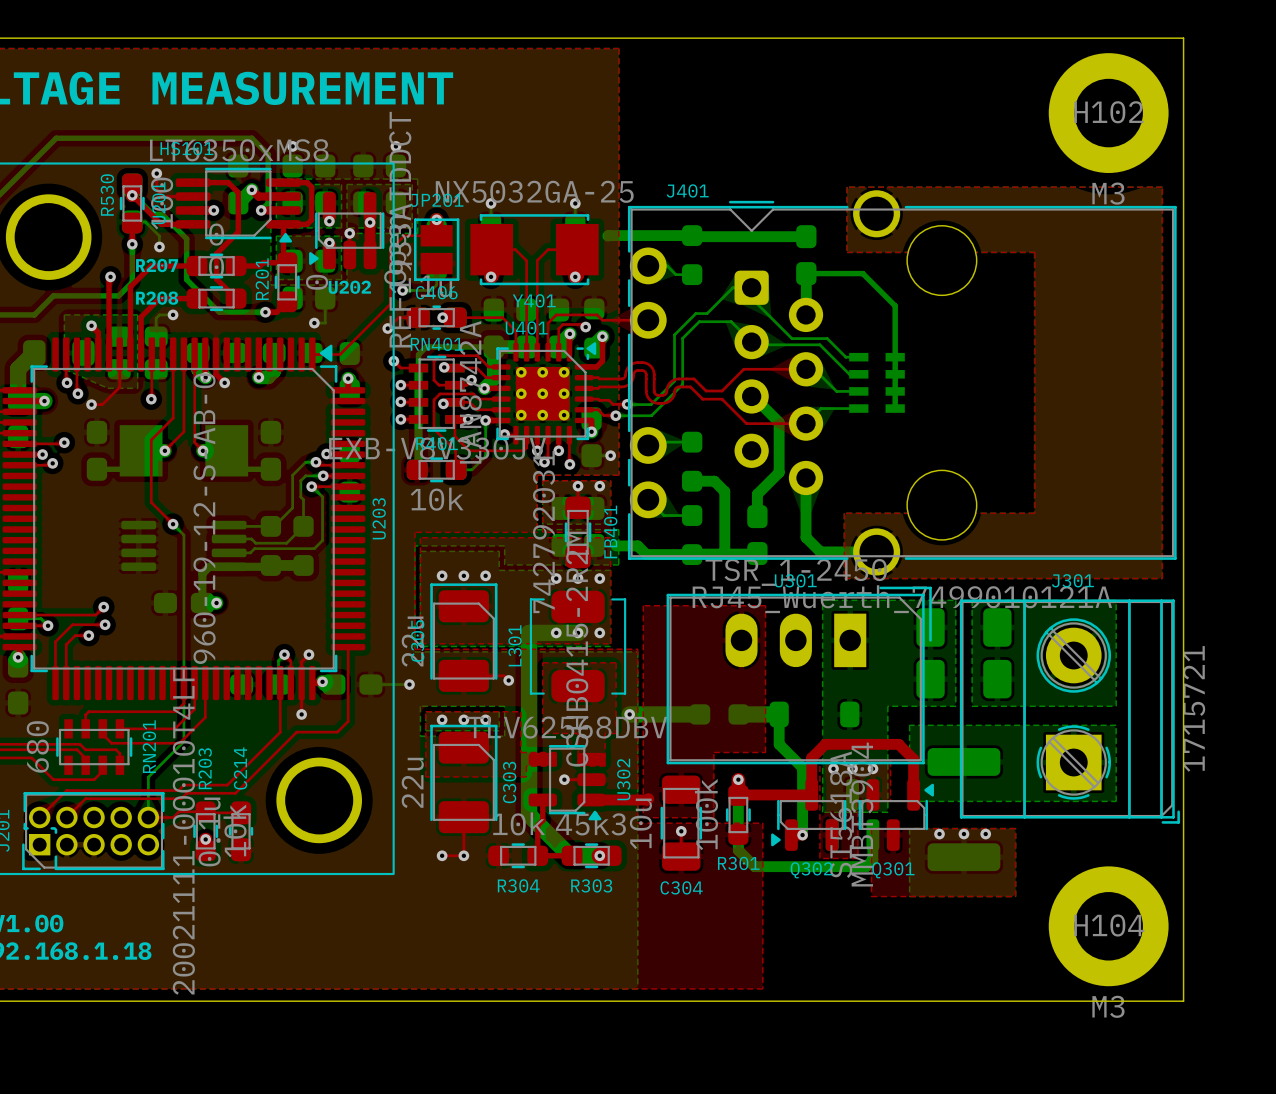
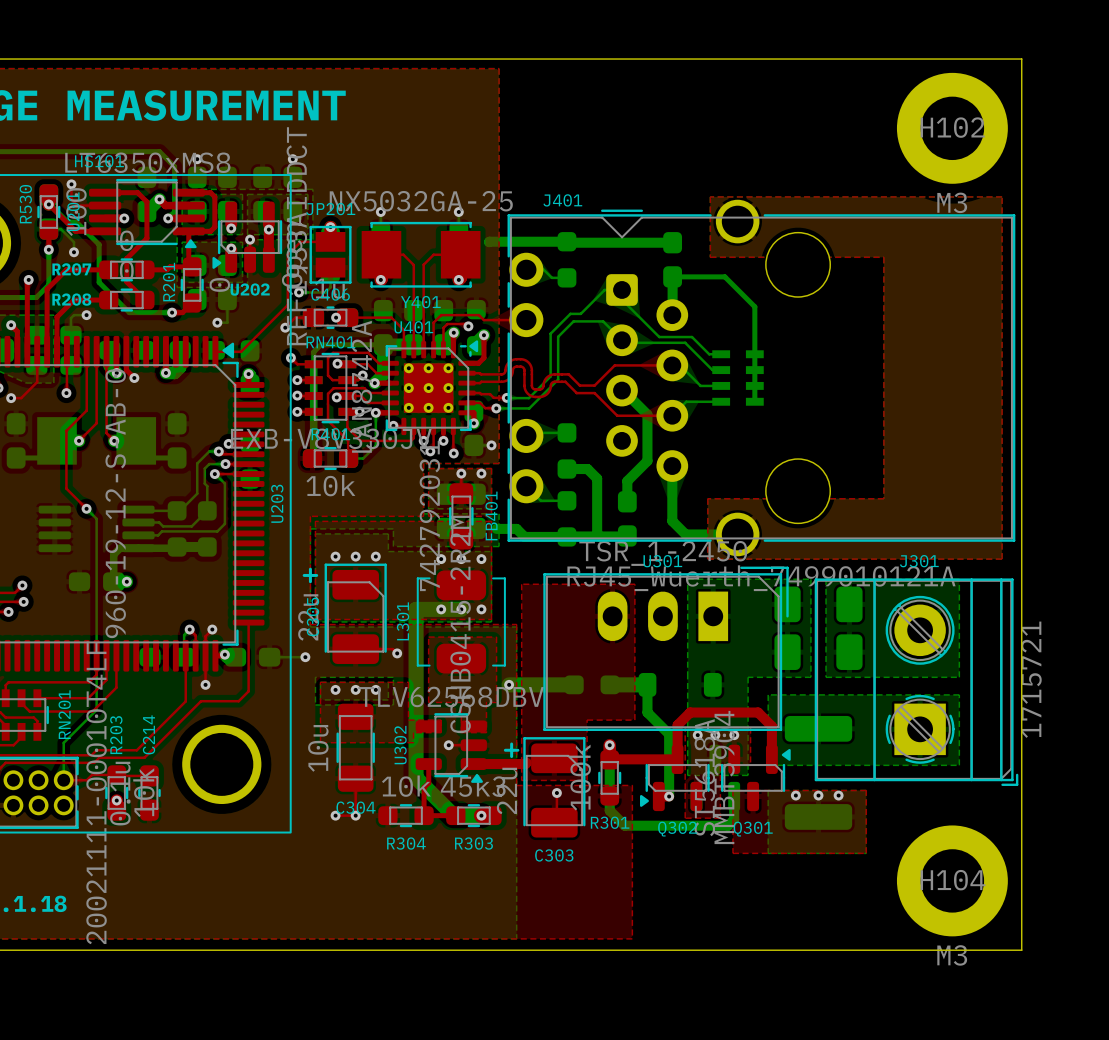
line: none -> (310, 569) (310, 581)
line: none -> (304, 575) (316, 575)
C303 position: (463, 778) -> (554, 787)
line: none -> (511, 743) (511, 756)
U302 name position: U302 (623, 779) -> U302 (400, 745)
C303 name rotation: 0° (509, 782) -> 90° clockwise (554, 855)
C303 name position: C303 (509, 782) -> C303 (554, 855)
line: none -> (505, 750) (517, 750)
C304 position: (681, 823) -> (355, 747)

